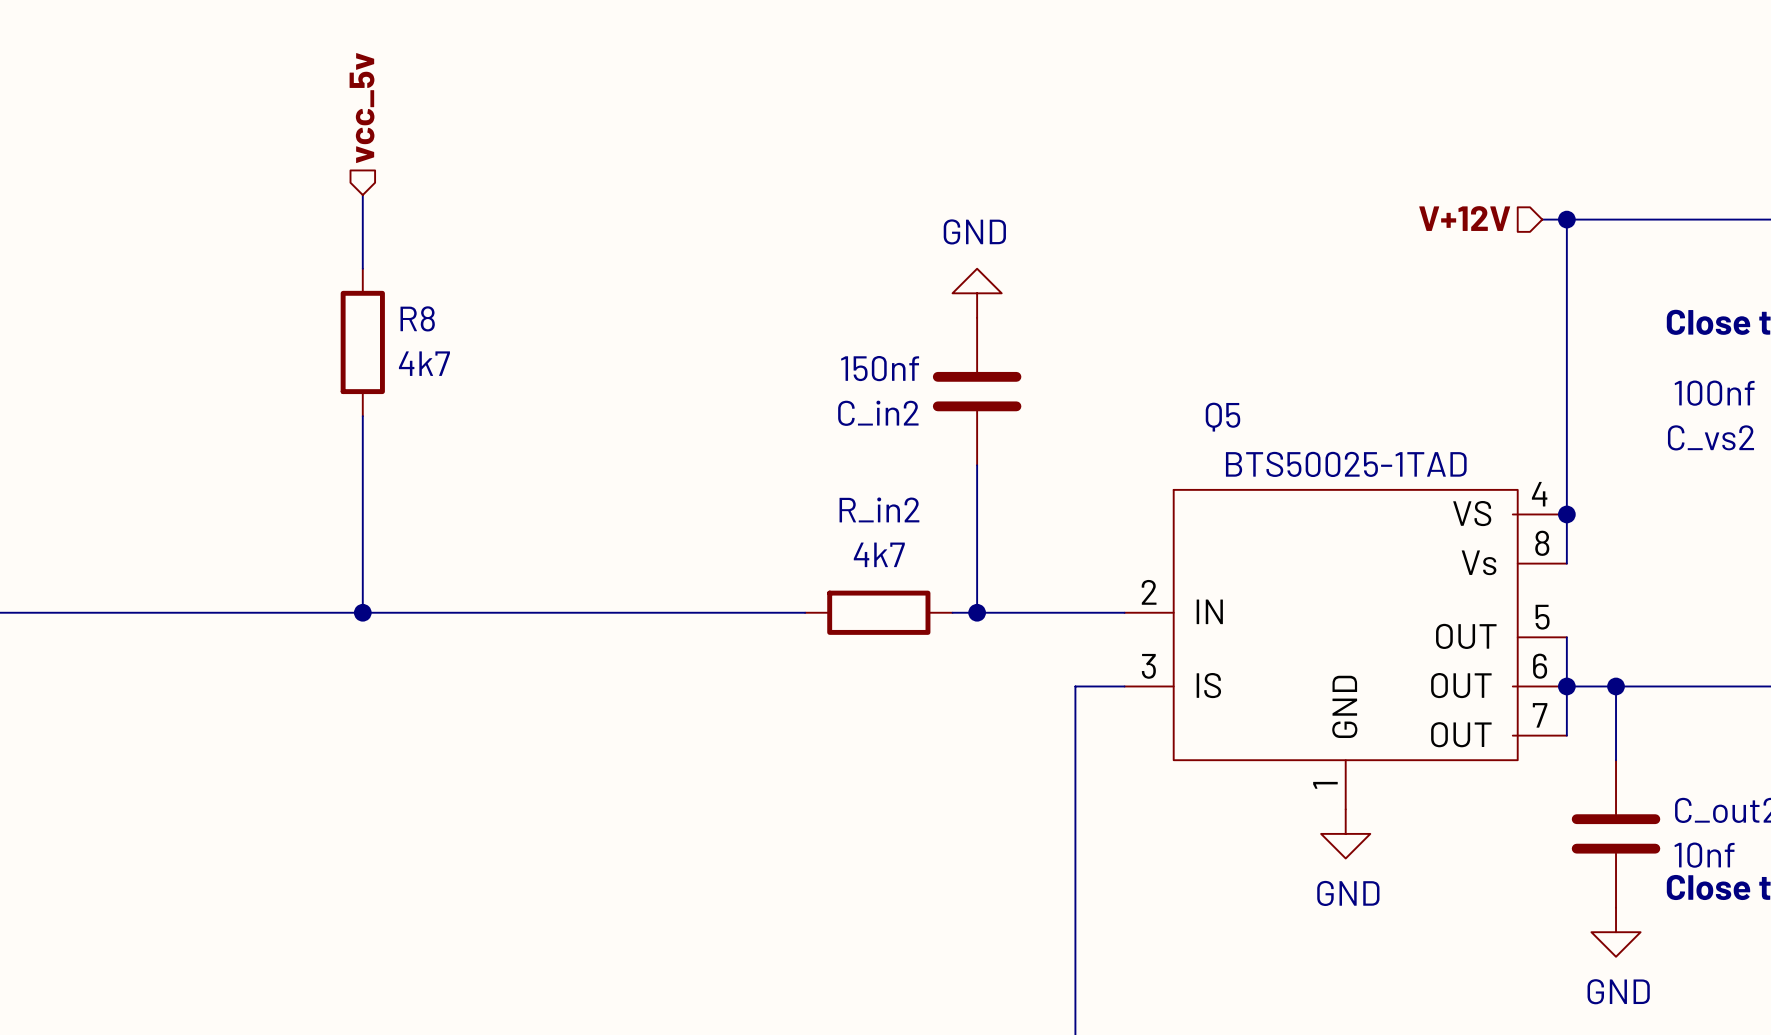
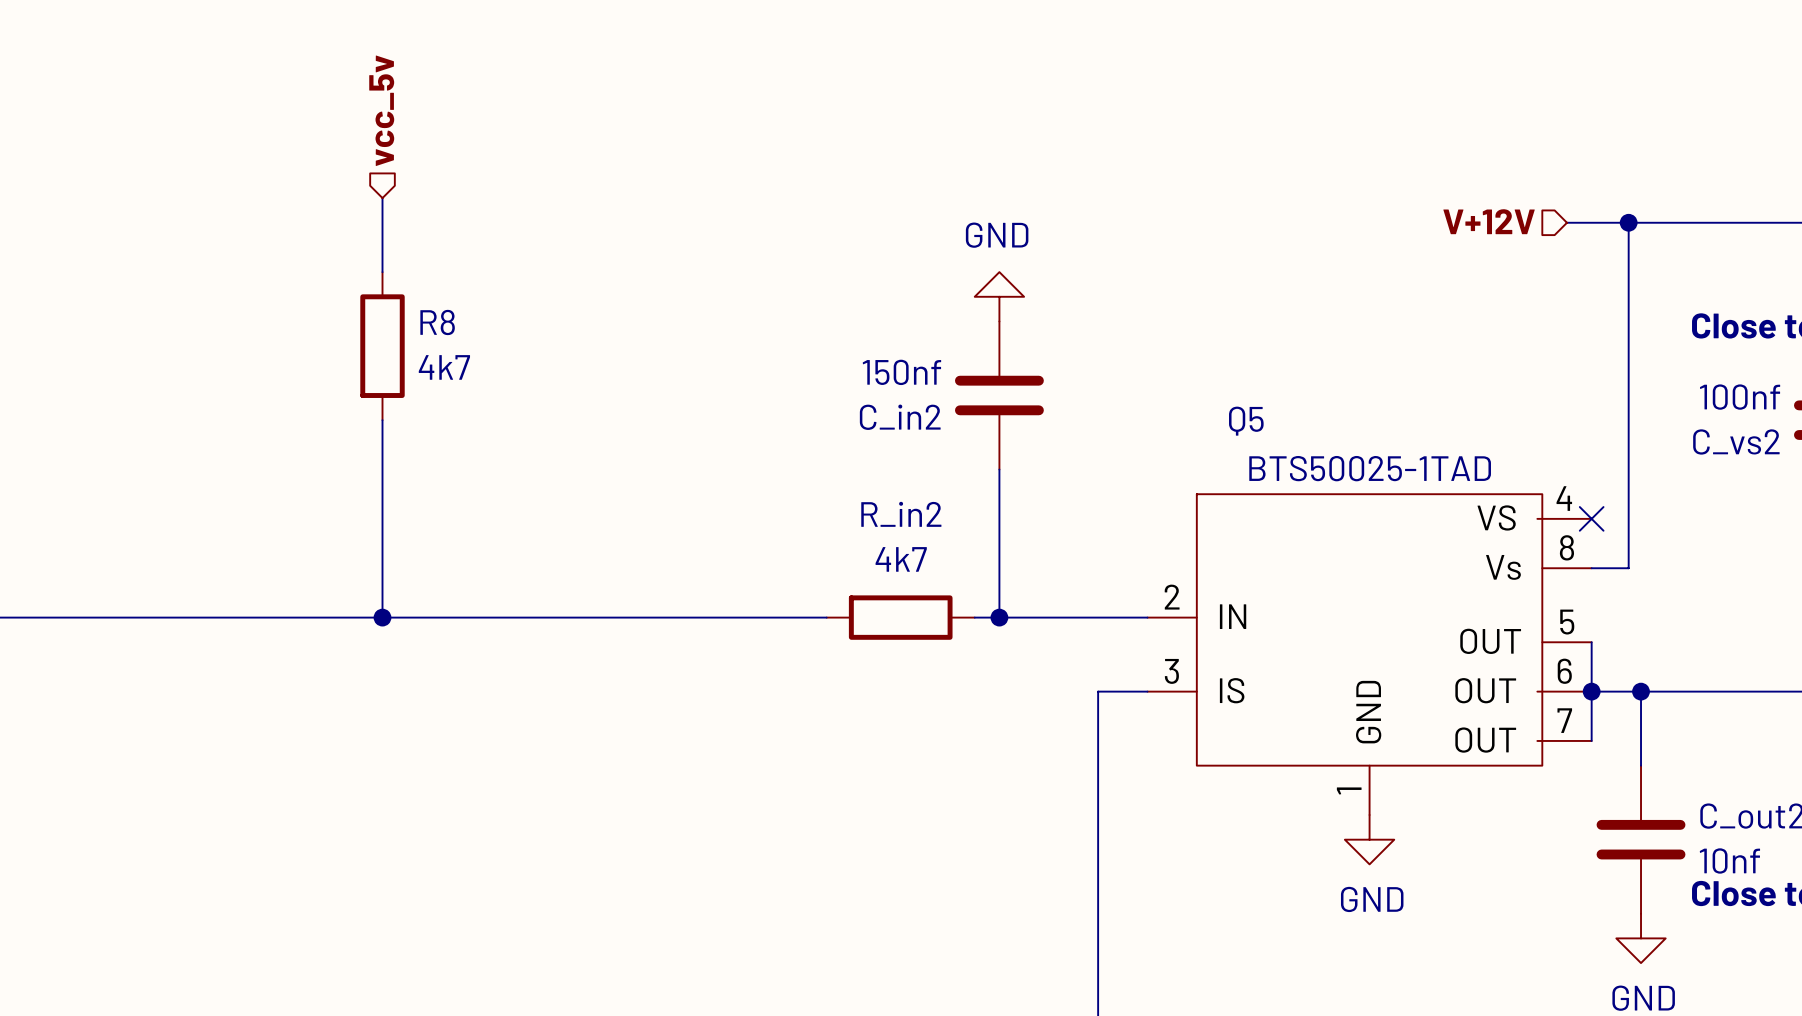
wire: (1566, 219) (1566, 563) -> (1628, 222) (1628, 568) (1591, 568)
junction position: (1566, 219) -> (1628, 222)
junction: (1566, 514) -> none
no-connect mark: none -> (1591, 518)

